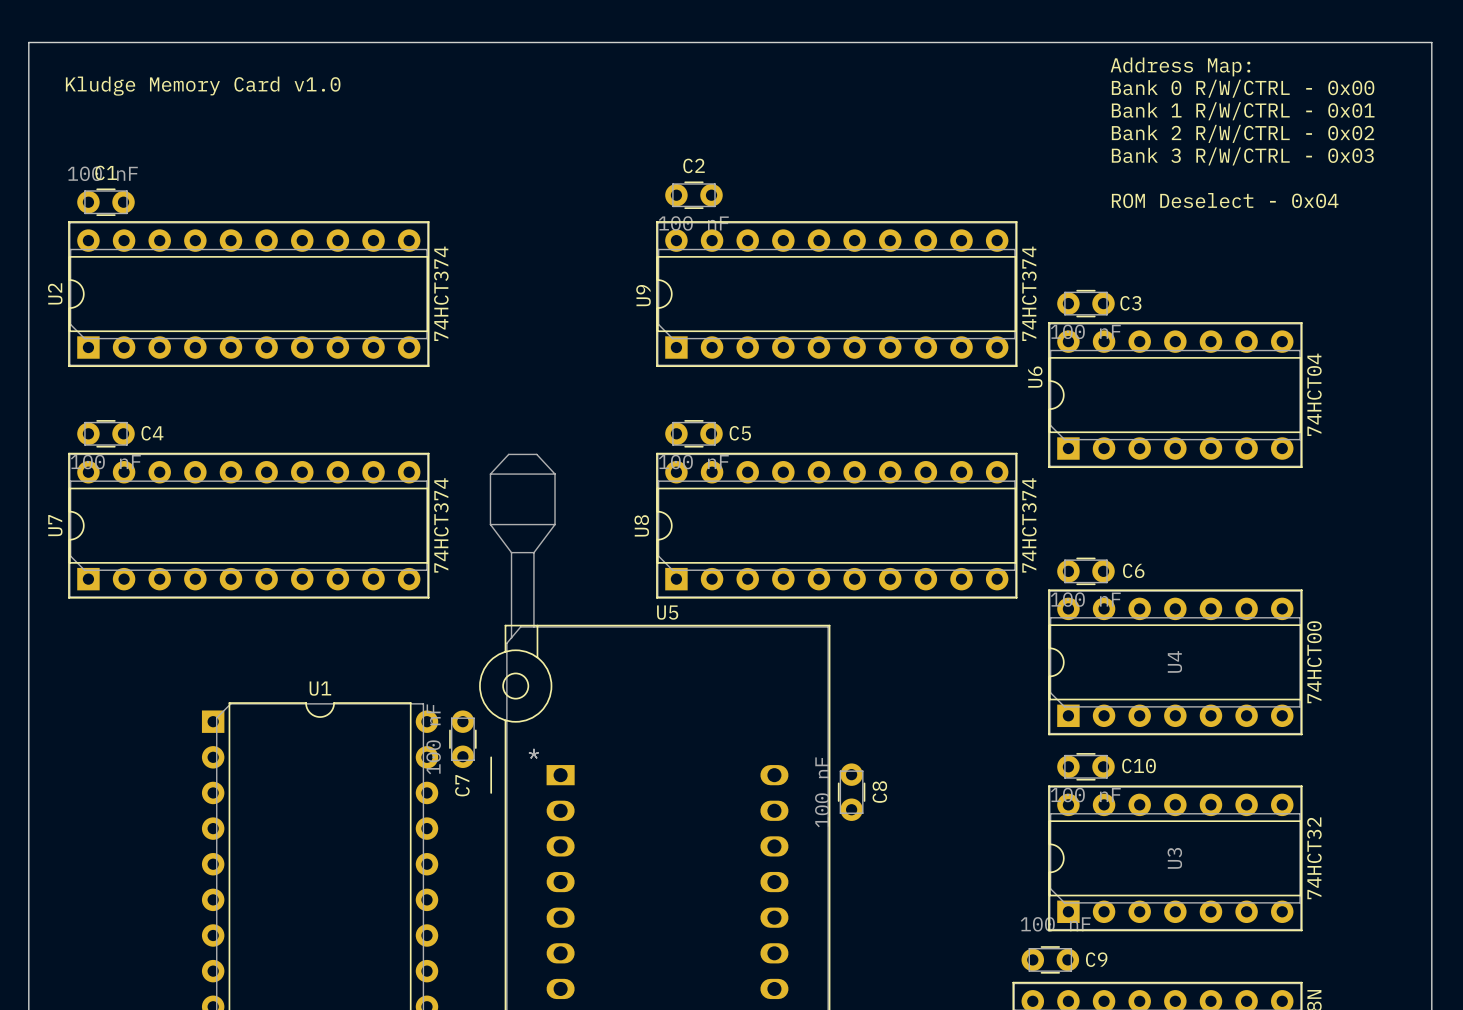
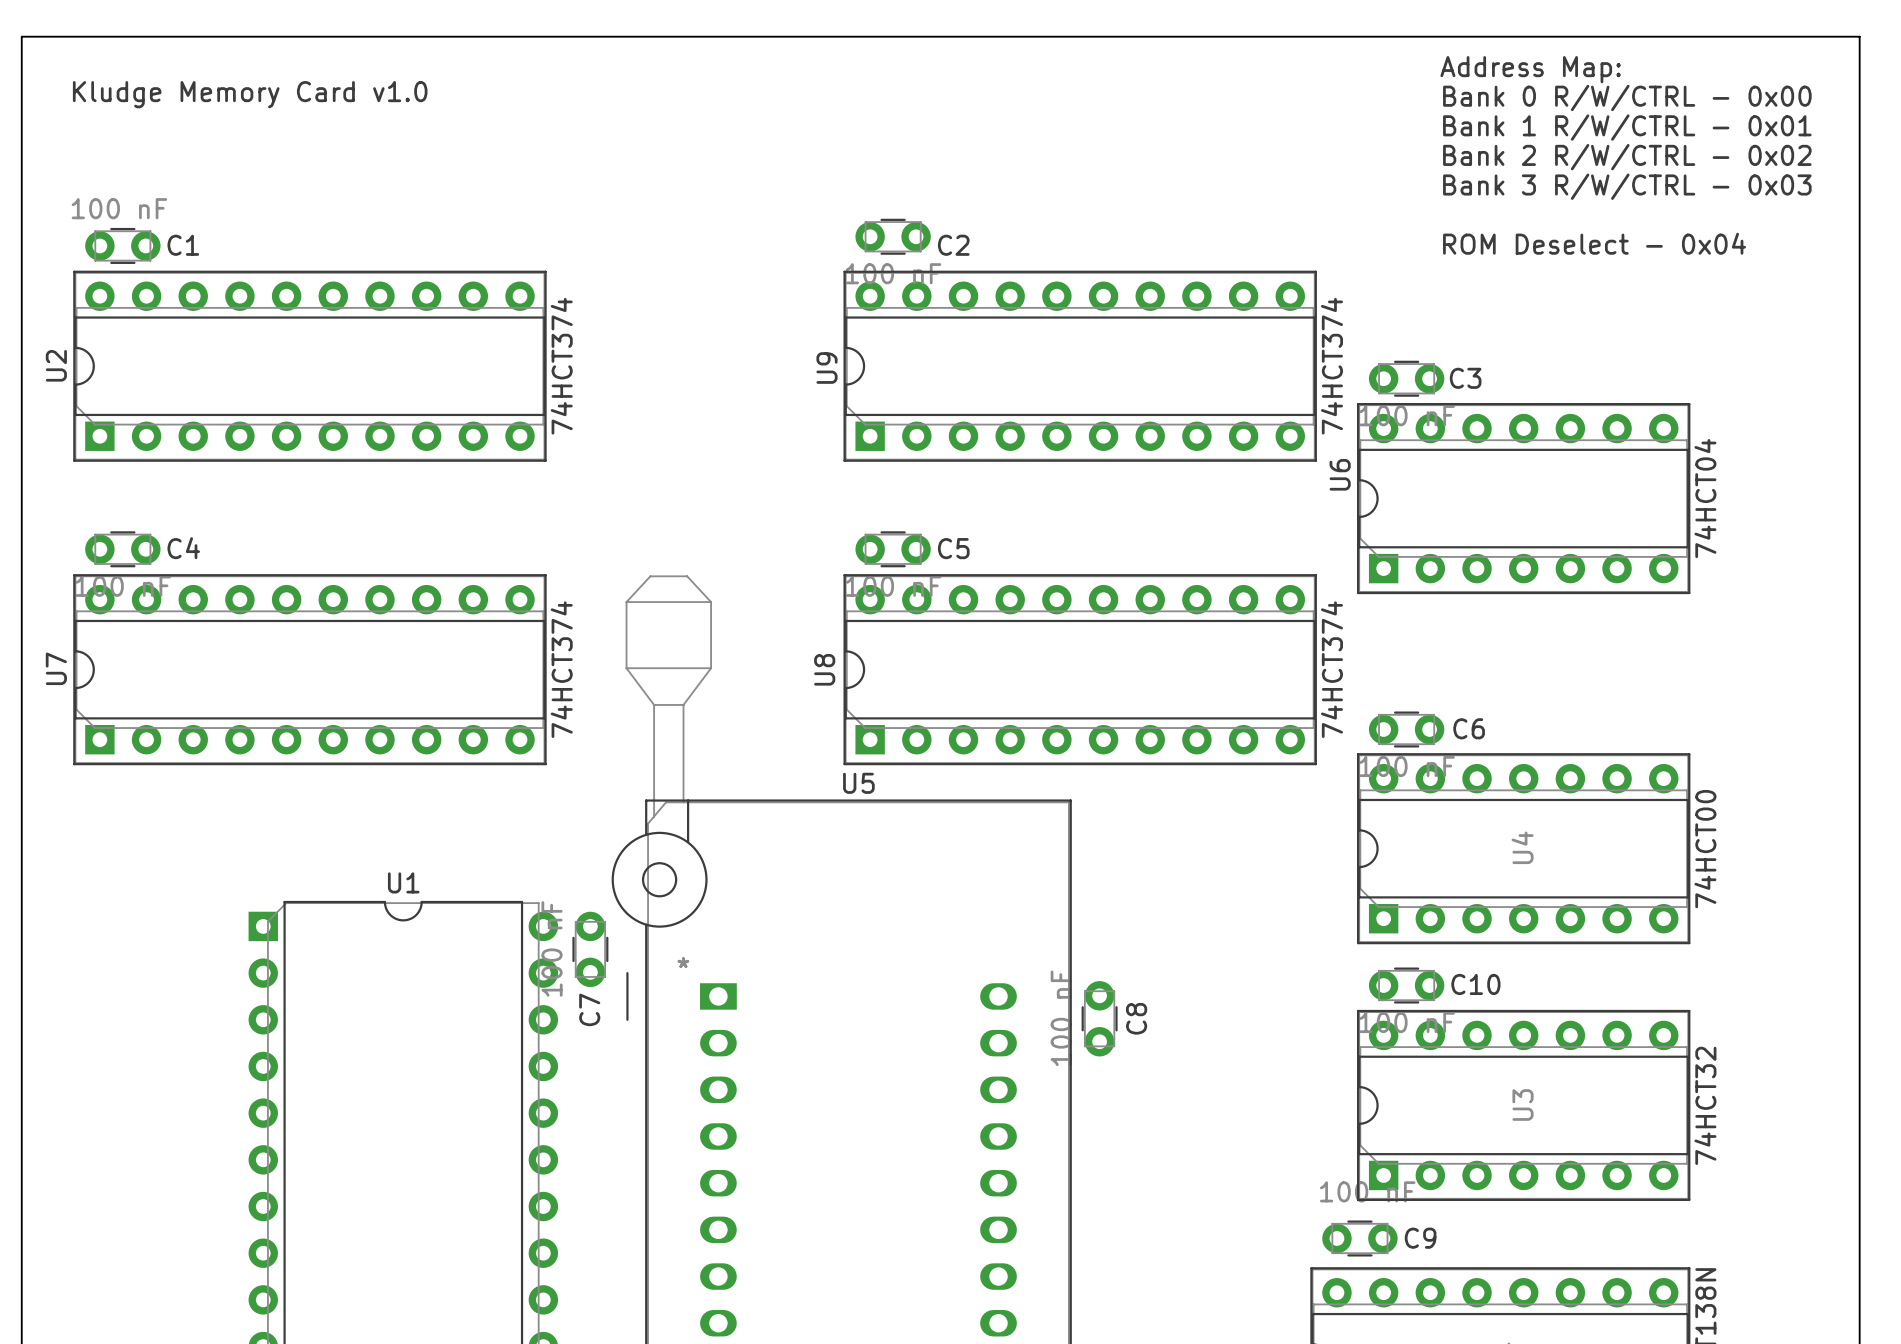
C2 name position: C2 (694, 165) -> C2 (953, 245)
C1 name position: C1 (106, 172) -> C1 (183, 245)

